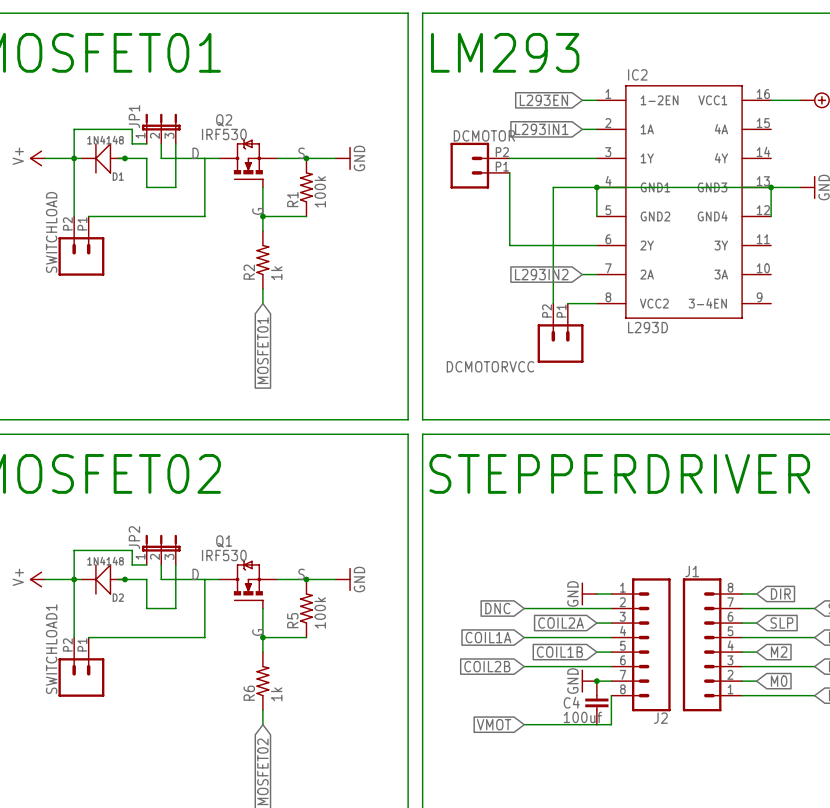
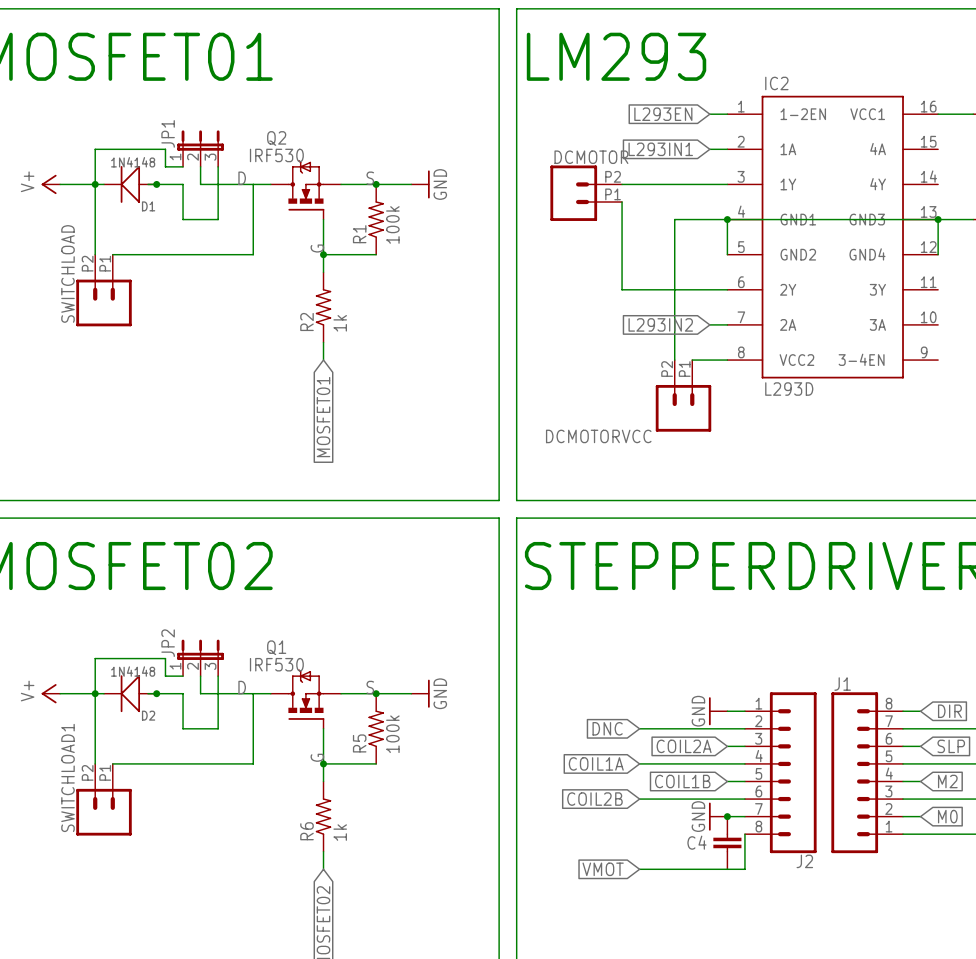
C4 value: 100uf (582, 717) -> none

